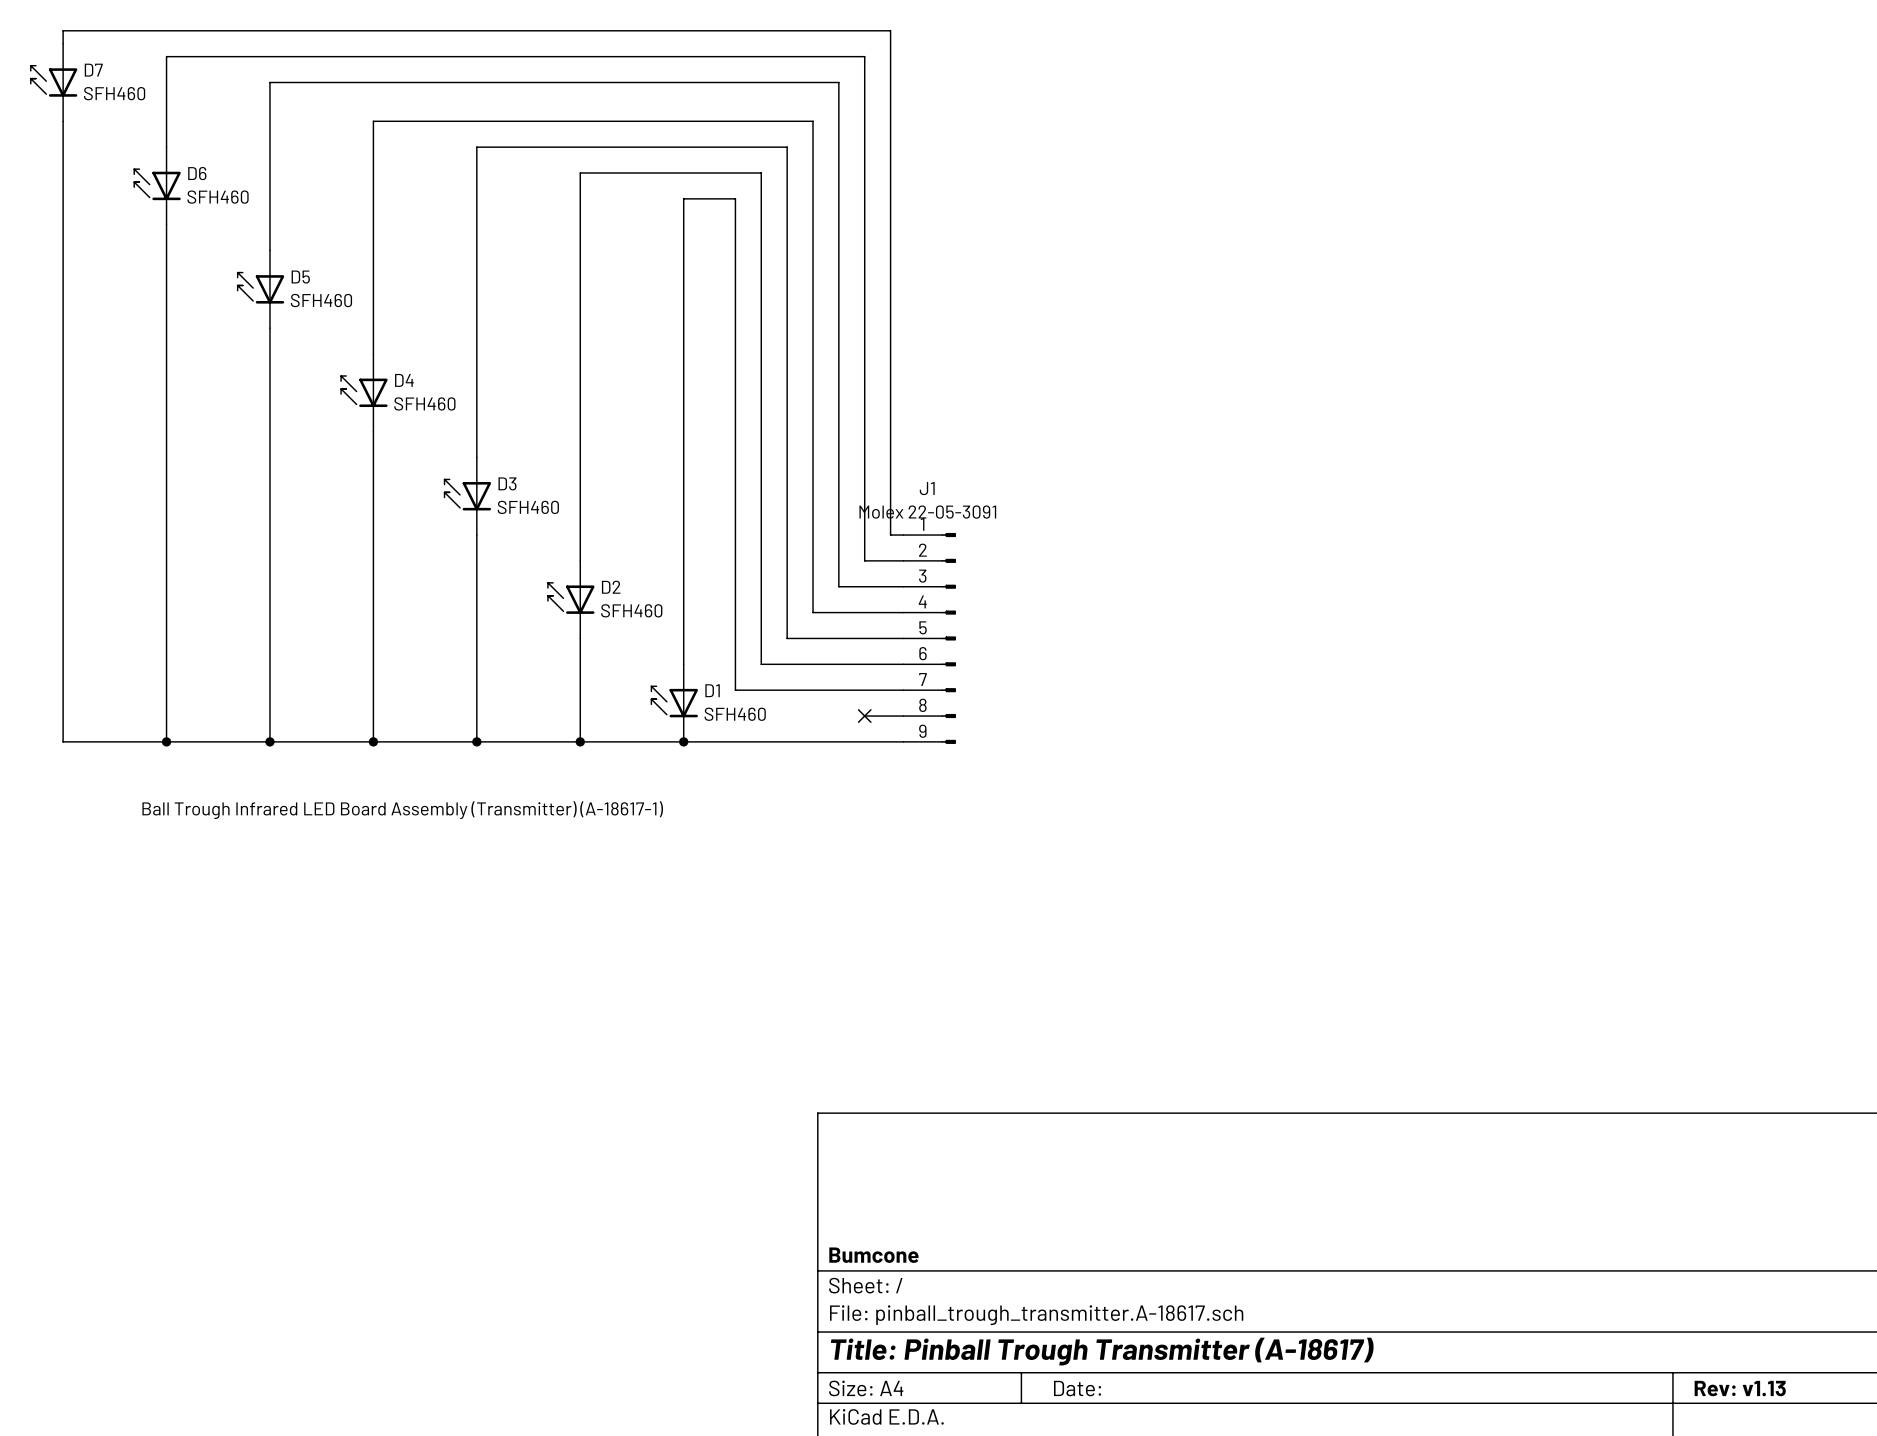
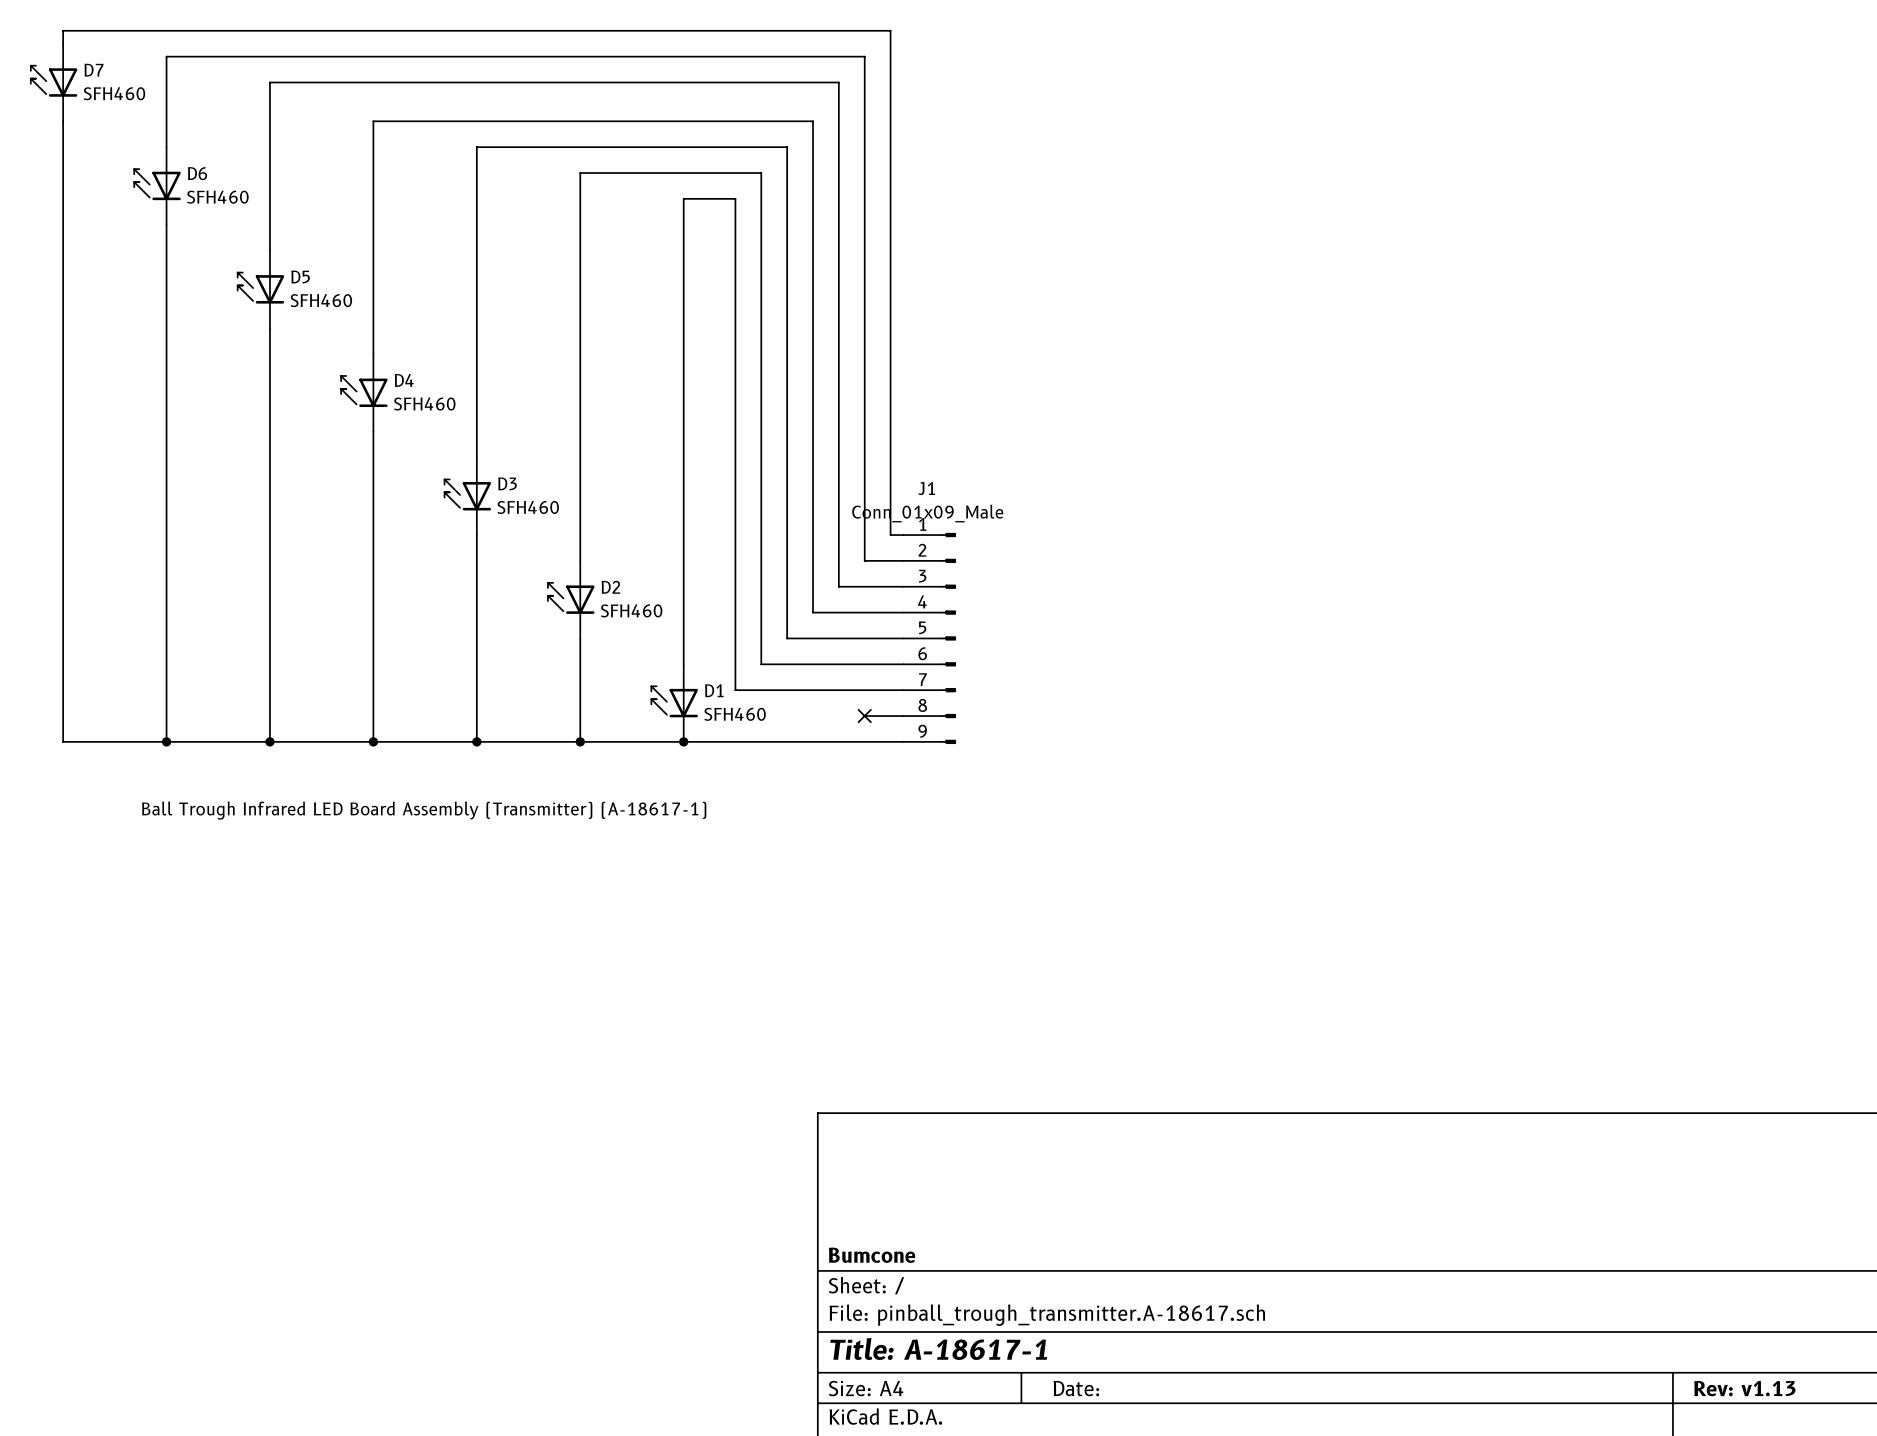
J1 value: Molex 22-05-3091 (927, 512) -> Conn_01x09_Male (927, 513)
title block: Title: Pinball Trough Transmitter (A-18617) (1102, 1351) -> Title: A-18617-1 (938, 1349)

